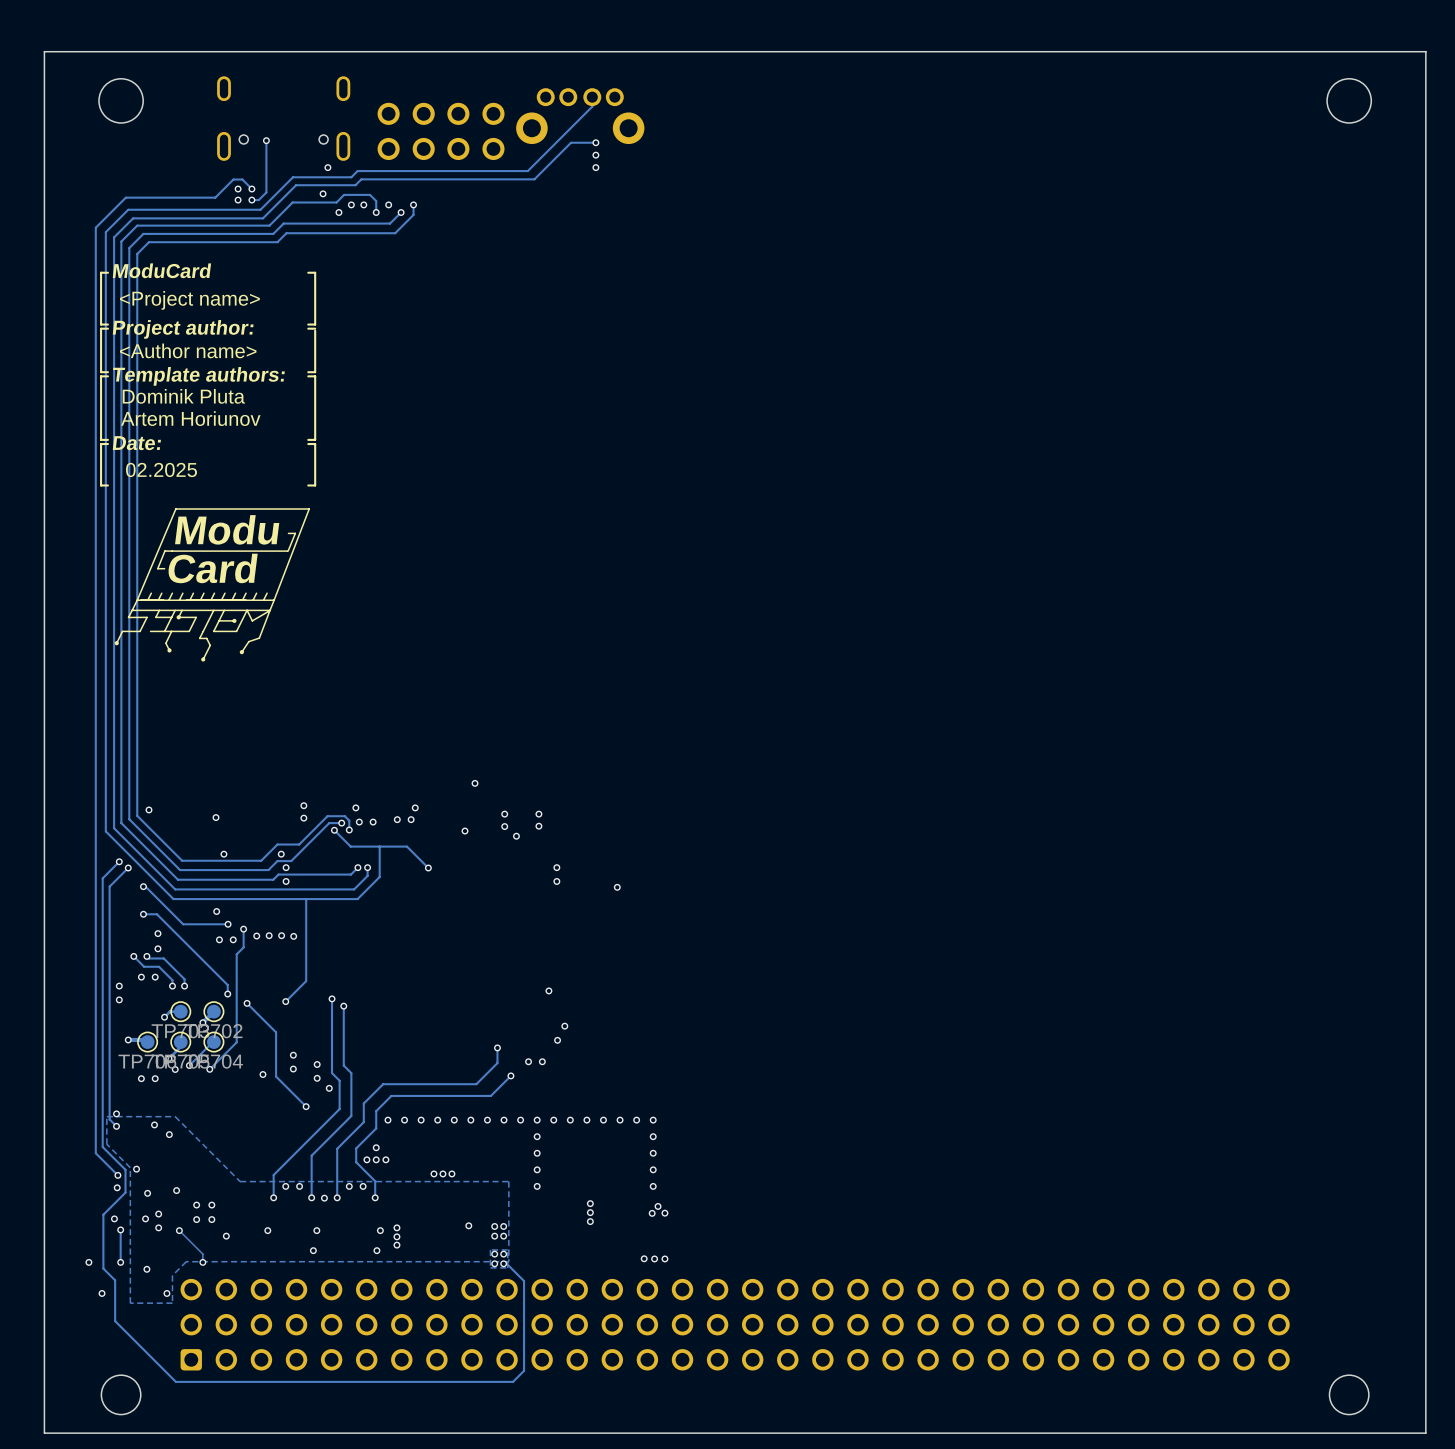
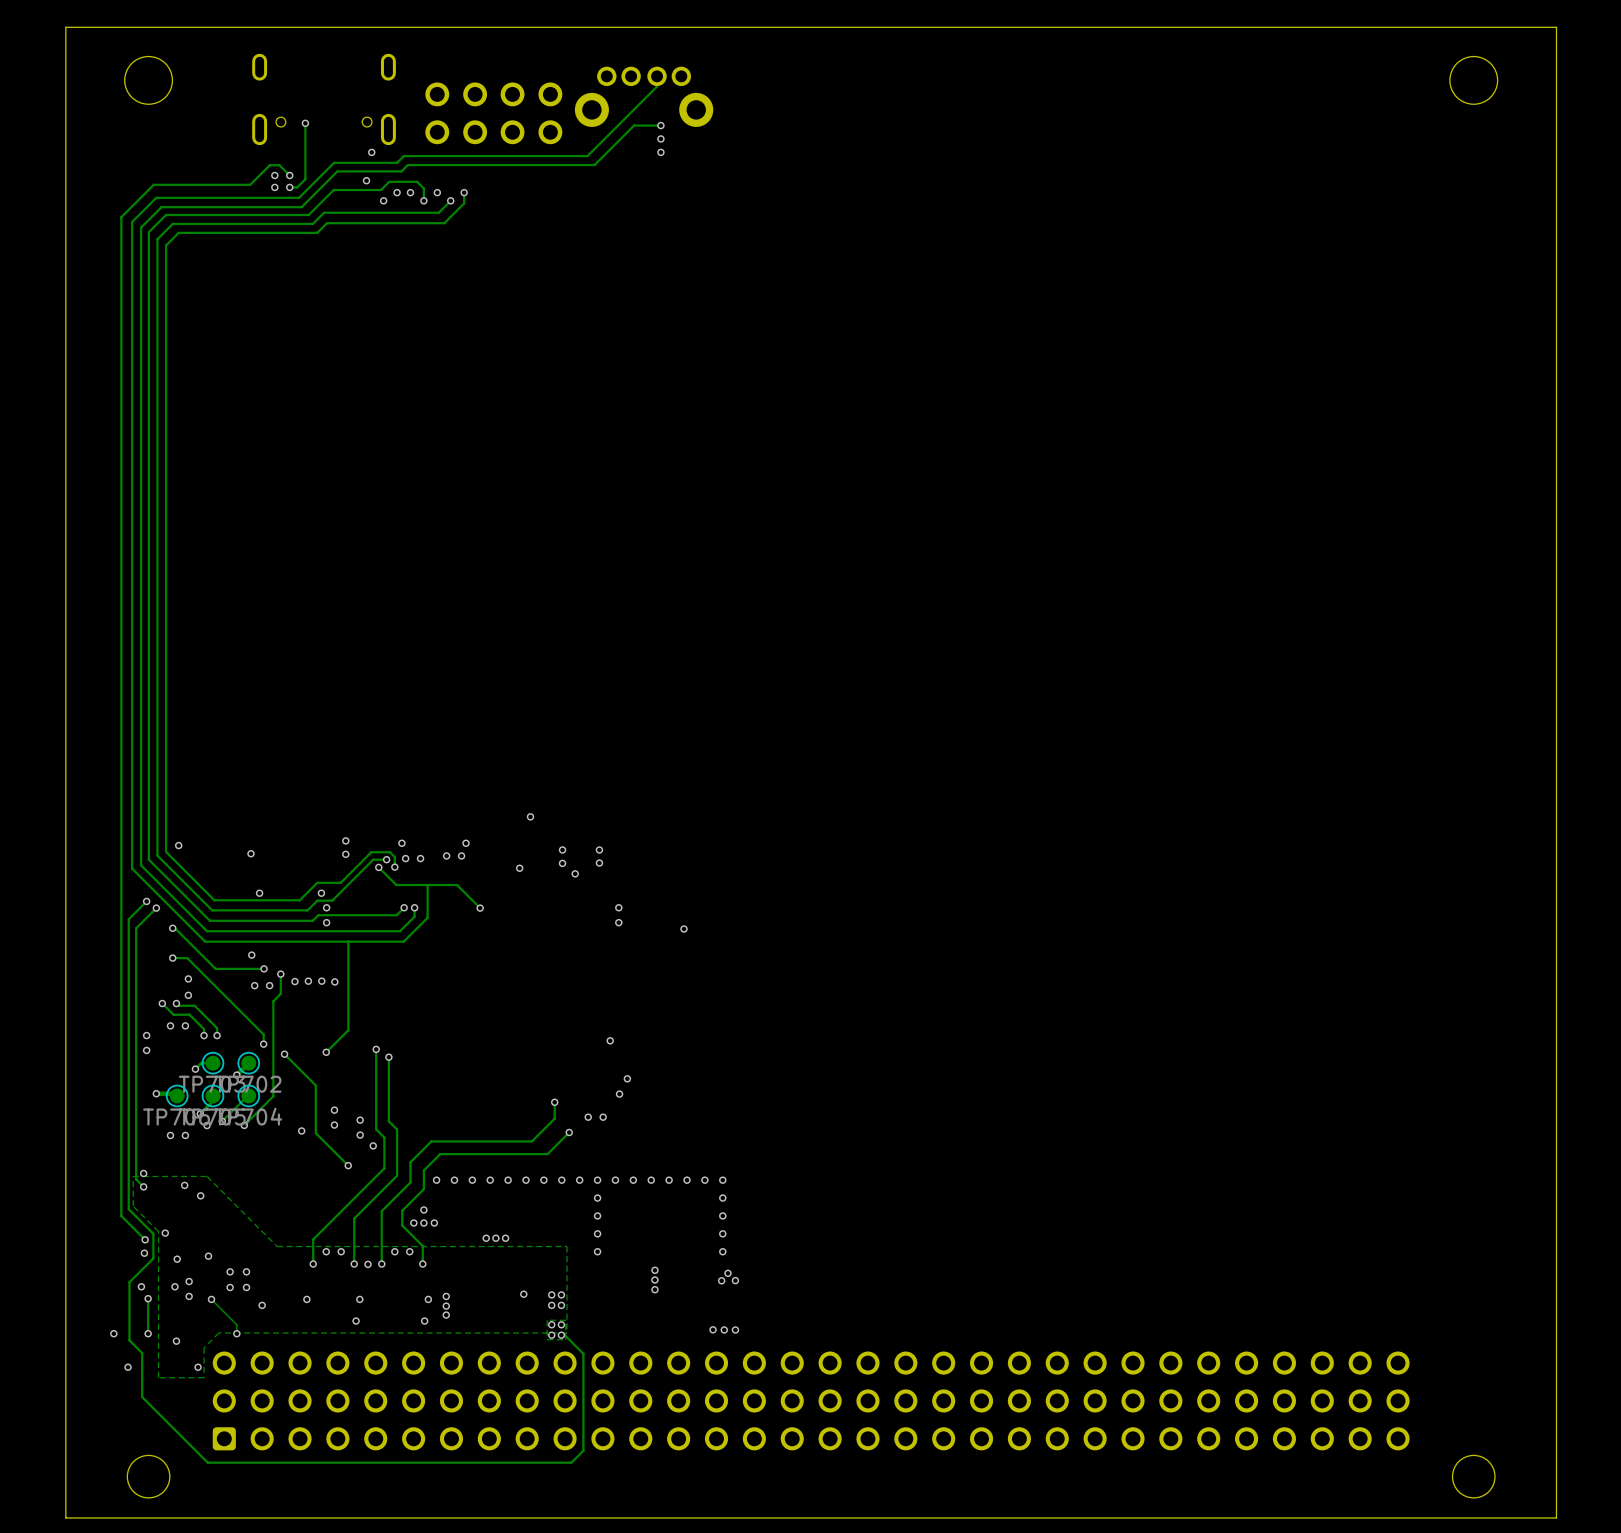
text: ModuCard (161, 270) -> none
line: (107, 272) (101, 272) (101, 324) (107, 324) -> none
line: (308, 272) (315, 272) (315, 324) (308, 324) -> none
text: <Project name> (189, 300) -> none
line: (107, 328) (101, 328) (101, 372) (107, 372) -> none
line: (315, 328) (308, 328) -> none
text: Project author: (183, 329) -> none
line: (315, 330) (315, 372) (308, 372) -> none
text: <Author name> (188, 350) -> none
line: (107, 376) (101, 376) (101, 439) (107, 439) -> none
text: Template authors: (198, 376) -> none
line: (308, 376) (315, 376) (315, 439) (308, 439) -> none
text: Dominik Pluta (183, 396) -> none
text: Artem Horiunov (190, 418) -> none
text: Date: (136, 443) -> none
line: (107, 444) (101, 444) (101, 485) (107, 485) -> none
line: (308, 444) (315, 444) (315, 485) (308, 485) -> none
text: 02.2025 (161, 469) -> none
text: Modu (227, 529) -> none
line: (288, 533) (295, 533) (288, 551) -> none
line: (287, 551) (164, 551) (157, 568) (164, 568) -> none
text: Card (212, 568) -> none
line: (151, 593) (147, 600) -> none
line: (161, 593) (158, 600) -> none
line: (172, 593) (168, 600) -> none
line: (182, 593) (179, 600) -> none
line: (193, 593) (189, 600) -> none
line: (203, 593) (200, 600) -> none
line: (214, 593) (210, 600) -> none
line: (224, 593) (221, 600) -> none
line: (235, 593) (232, 600) -> none
line: (246, 593) (242, 600) -> none
line: (256, 593) (253, 600) -> none
line: (267, 593) (263, 600) -> none
line: (137, 600) (132, 610) -> none
line: (274, 600) (309, 508) (175, 508) (137, 600) -> none
line: (274, 600) (137, 600) -> none
line: (274, 600) (270, 610) (132, 610) -> none
line: (132, 610) (128, 617) (147, 617) (140, 631) (122, 631) (116, 643) -> none
line: (159, 610) (155, 617) (171, 617) -> none
line: (175, 610) (171, 617) -> none
line: (182, 610) (178, 617) (196, 617) (189, 631) (150, 631) -> none
line: (213, 610) (199, 638) (206, 638) (210, 645) (203, 659) -> none
line: (224, 610) (213, 631) (236, 631) (247, 610) (252, 620) (269, 610) (259, 638) (248, 641) (241, 652) -> none
drawing: [176, 615, 181, 620] -> none
line: (171, 617) (164, 631) -> none
drawing: [232, 618, 237, 623] -> none
line: (234, 620) (219, 620) -> none
line: (171, 631) (165, 643) -> none
drawing: [114, 641, 119, 646] -> none
line: (165, 643) (169, 650) -> none
drawing: [167, 648, 172, 653] -> none
drawing: [239, 650, 244, 655] -> none
drawing: [201, 657, 206, 662] -> none

